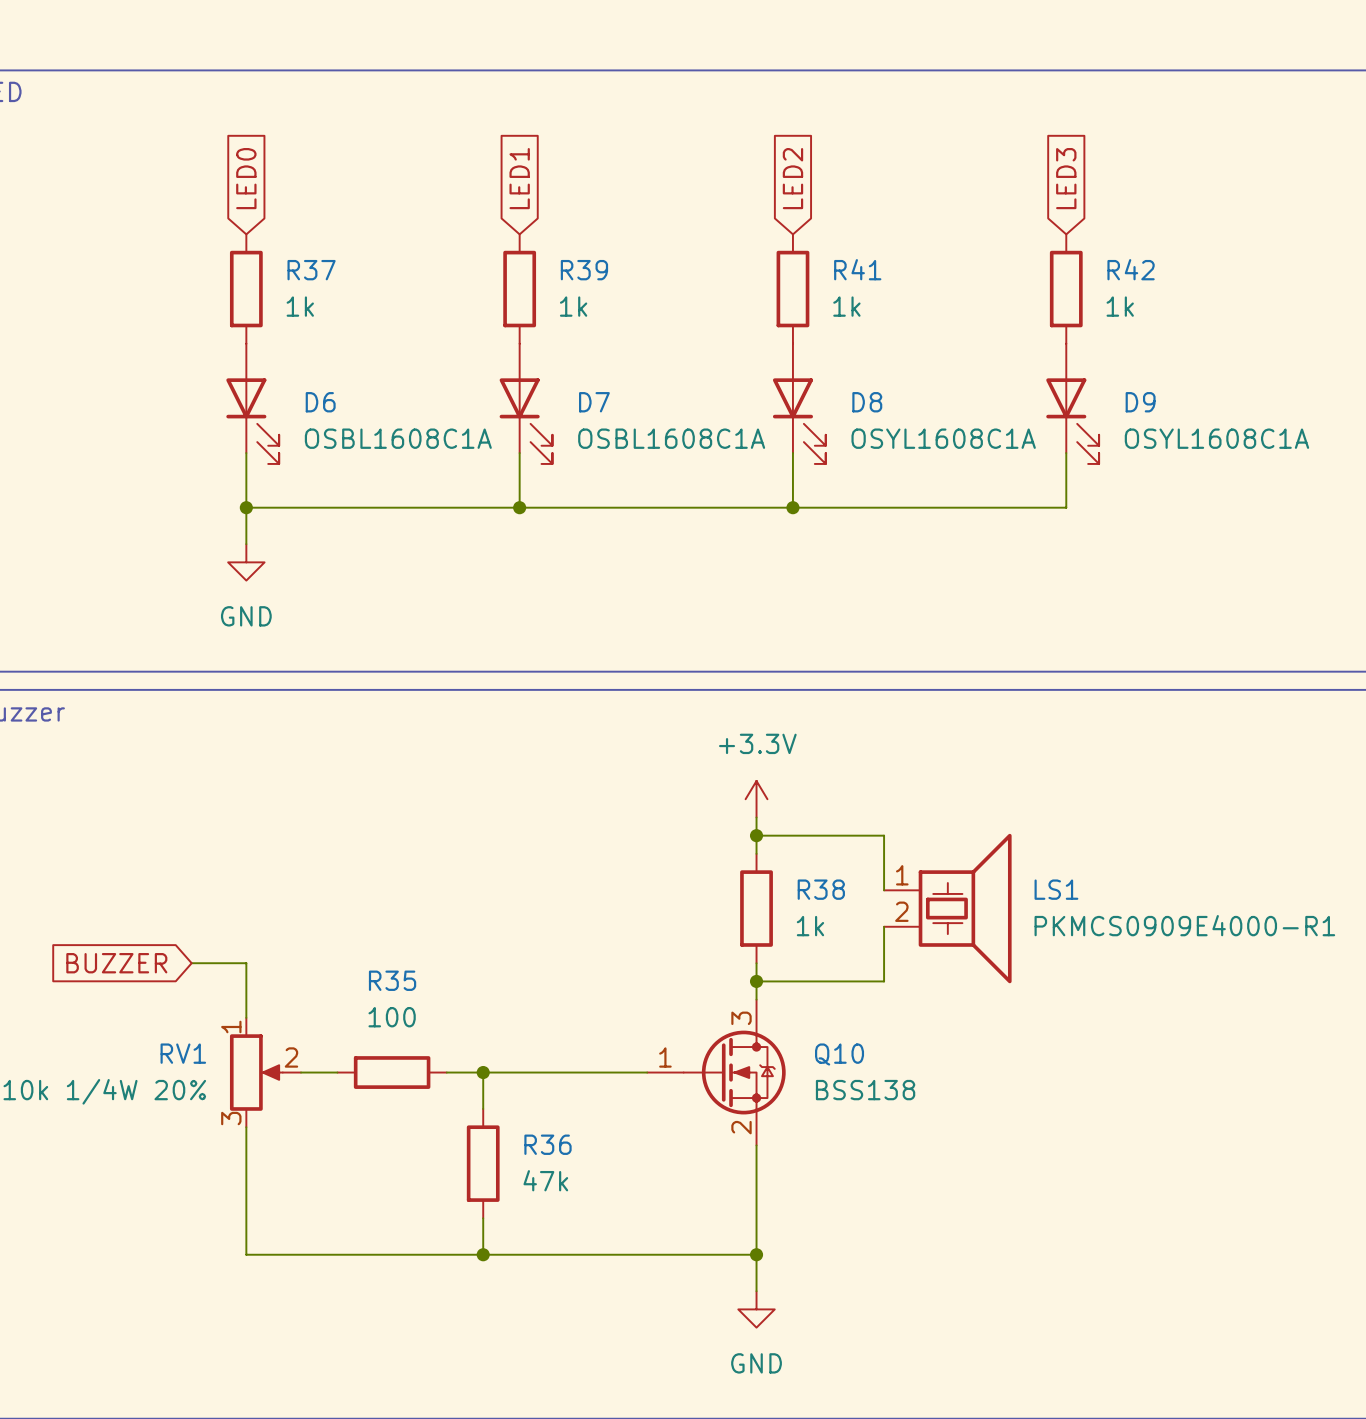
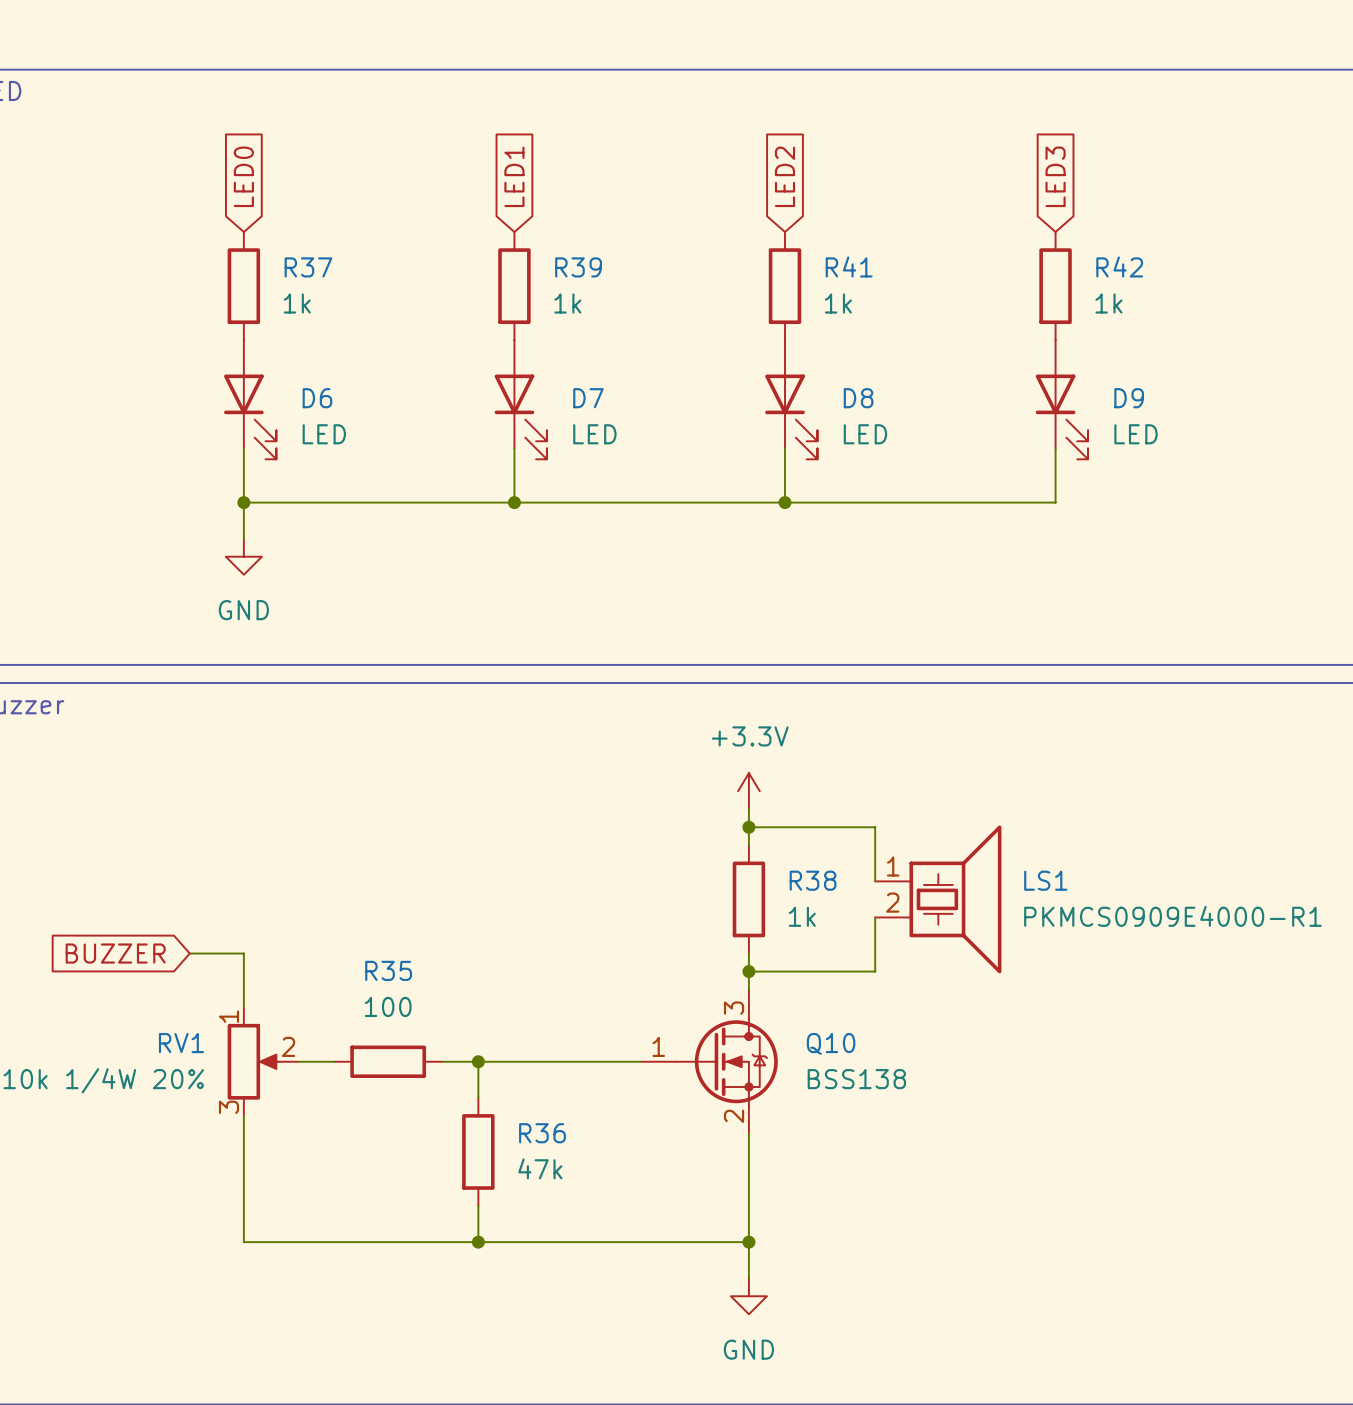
D6 value: OSBL1608C1A (398, 438) -> LED (324, 434)
D7 value: OSBL1608C1A (671, 438) -> LED (594, 434)
D8 value: OSYL1608C1A (943, 438) -> LED (865, 434)
D9 value: OSYL1608C1A (1216, 438) -> LED (1136, 434)

